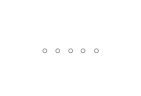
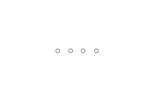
via: (44, 50) -> none

